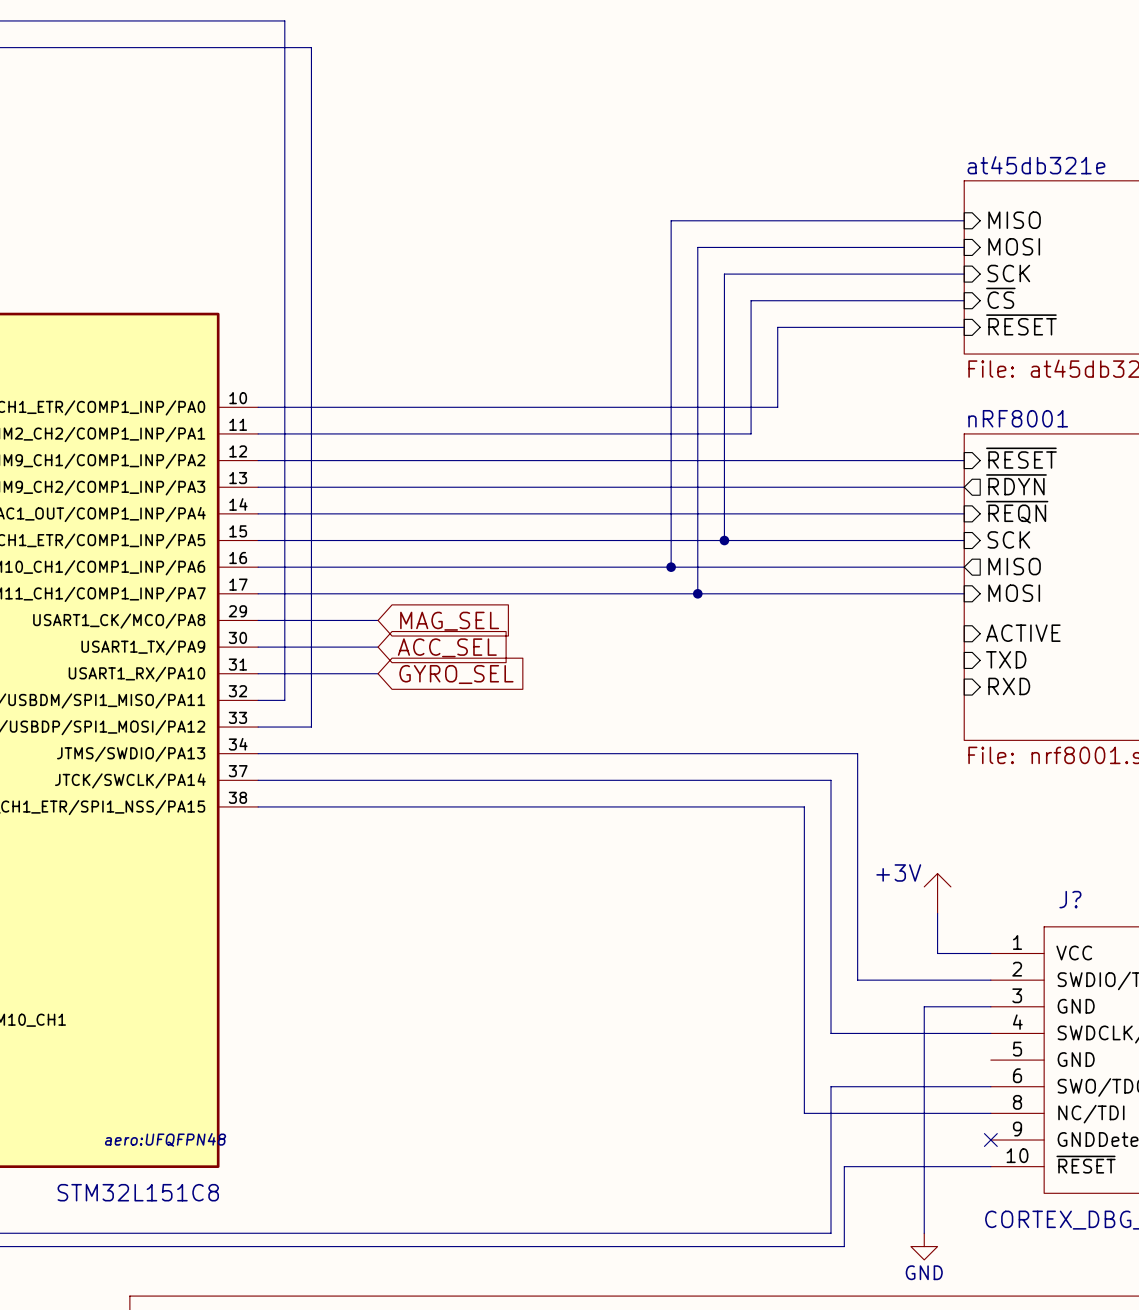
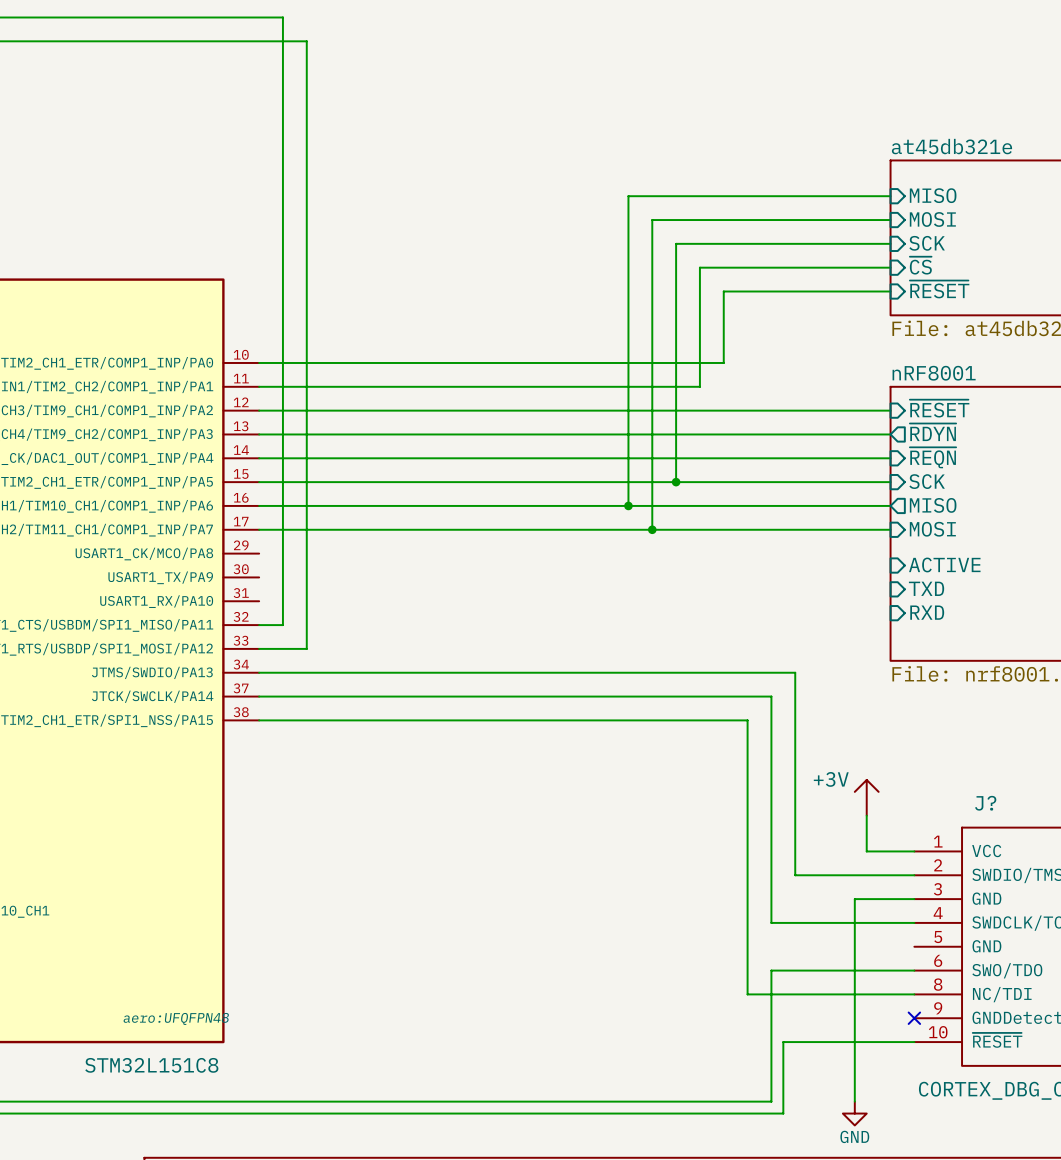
wire: (258, 620) (378, 620) -> none
global label: MAG_SEL (449, 621) -> none
wire: (258, 647) (378, 647) -> none
global label: ACC_SEL (447, 647) -> none
wire: (258, 673) (378, 673) -> none
global label: GYRO_SEL (456, 674) -> none

